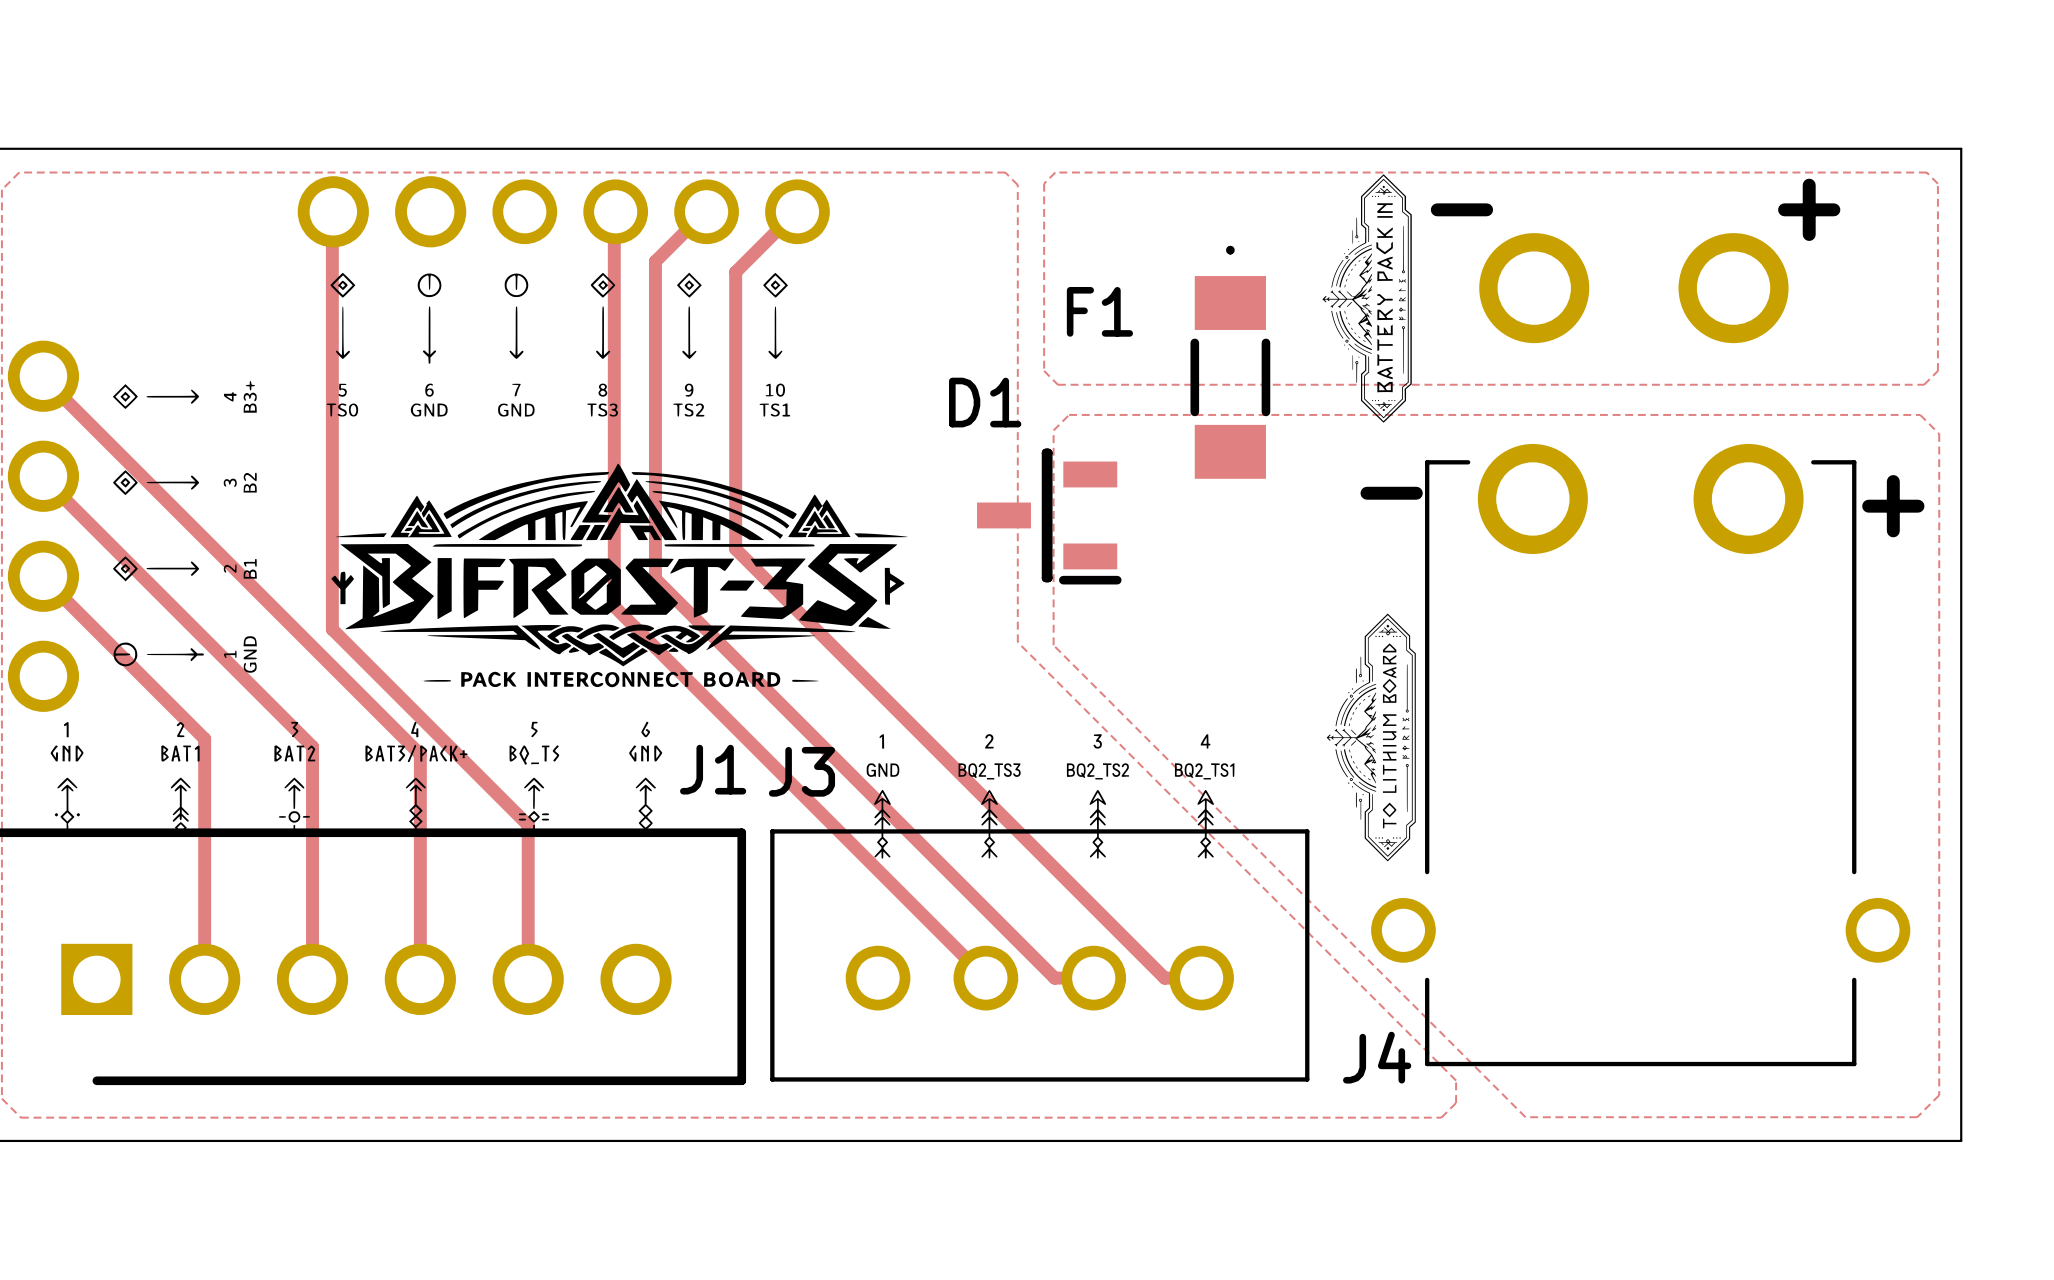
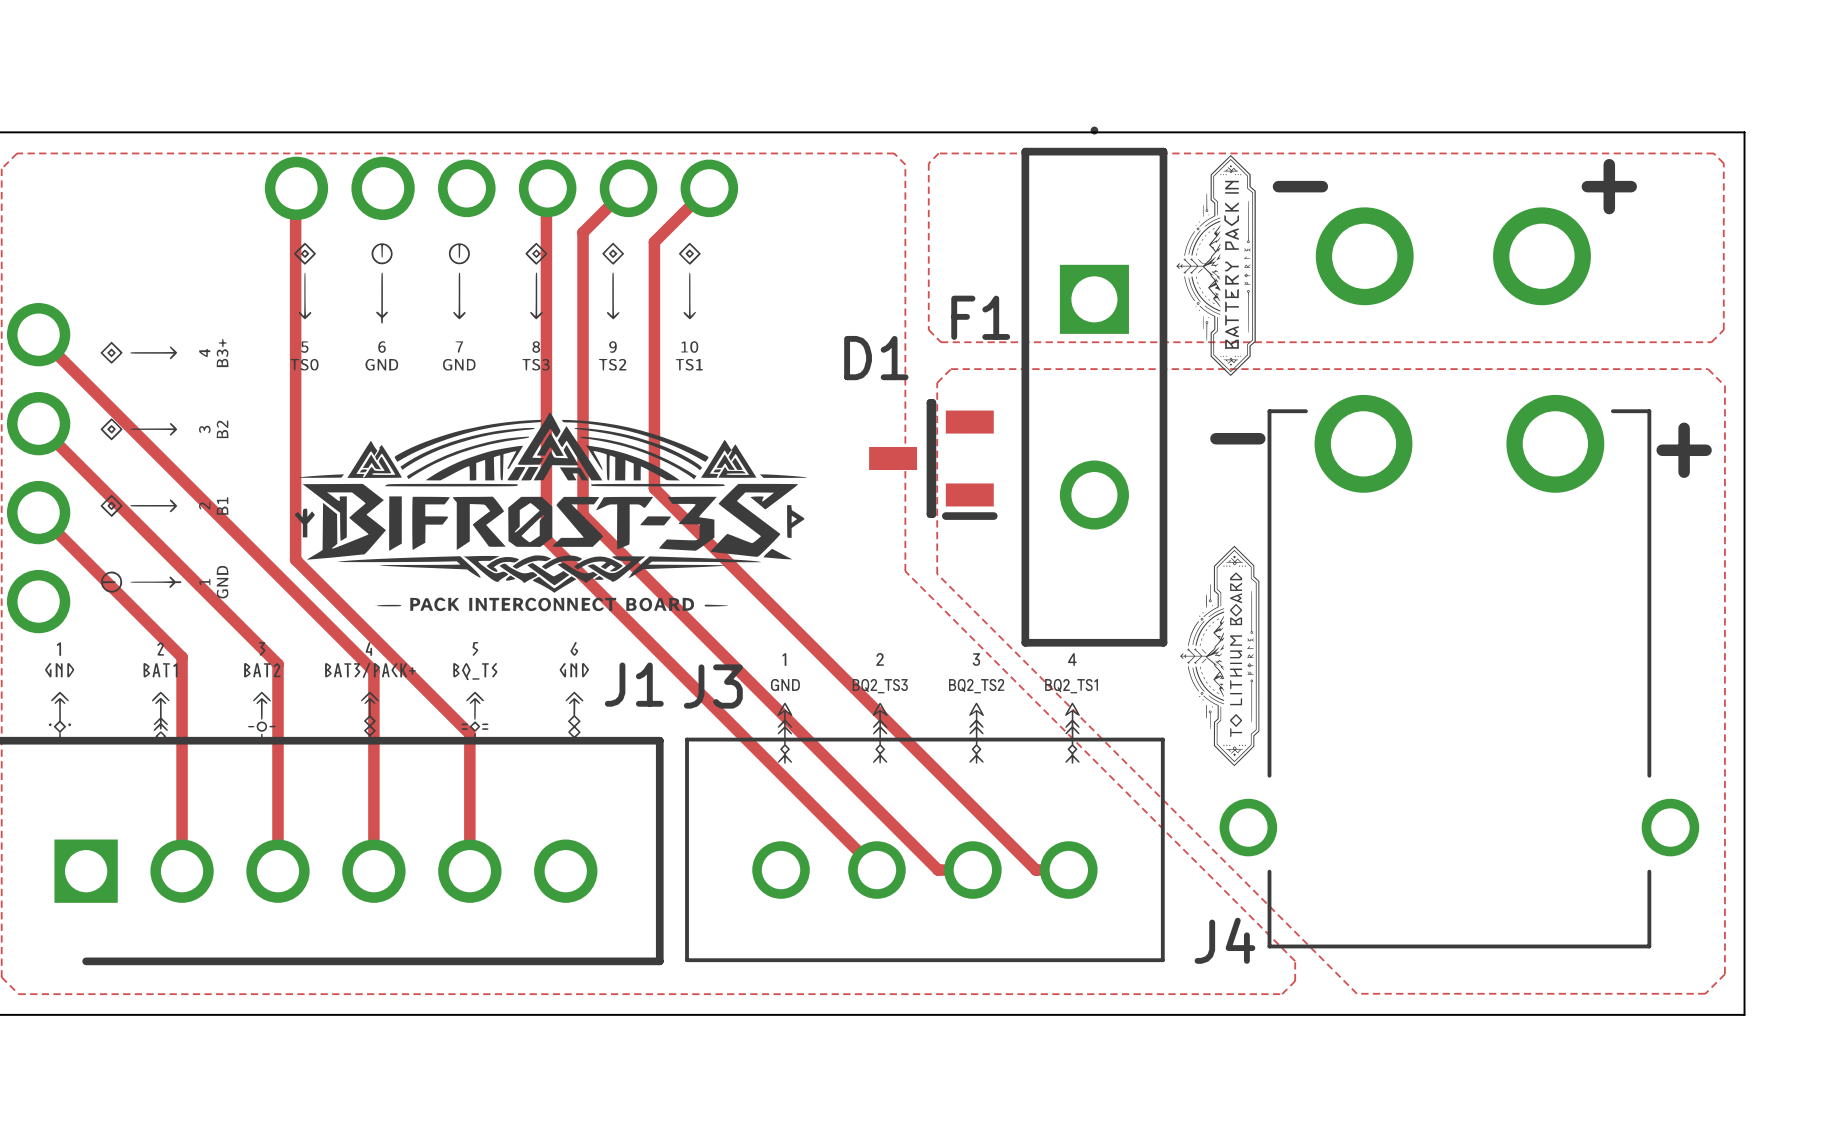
F1 footprint: [1190, 245, 1271, 479] -> [1021, 126, 1168, 647]

